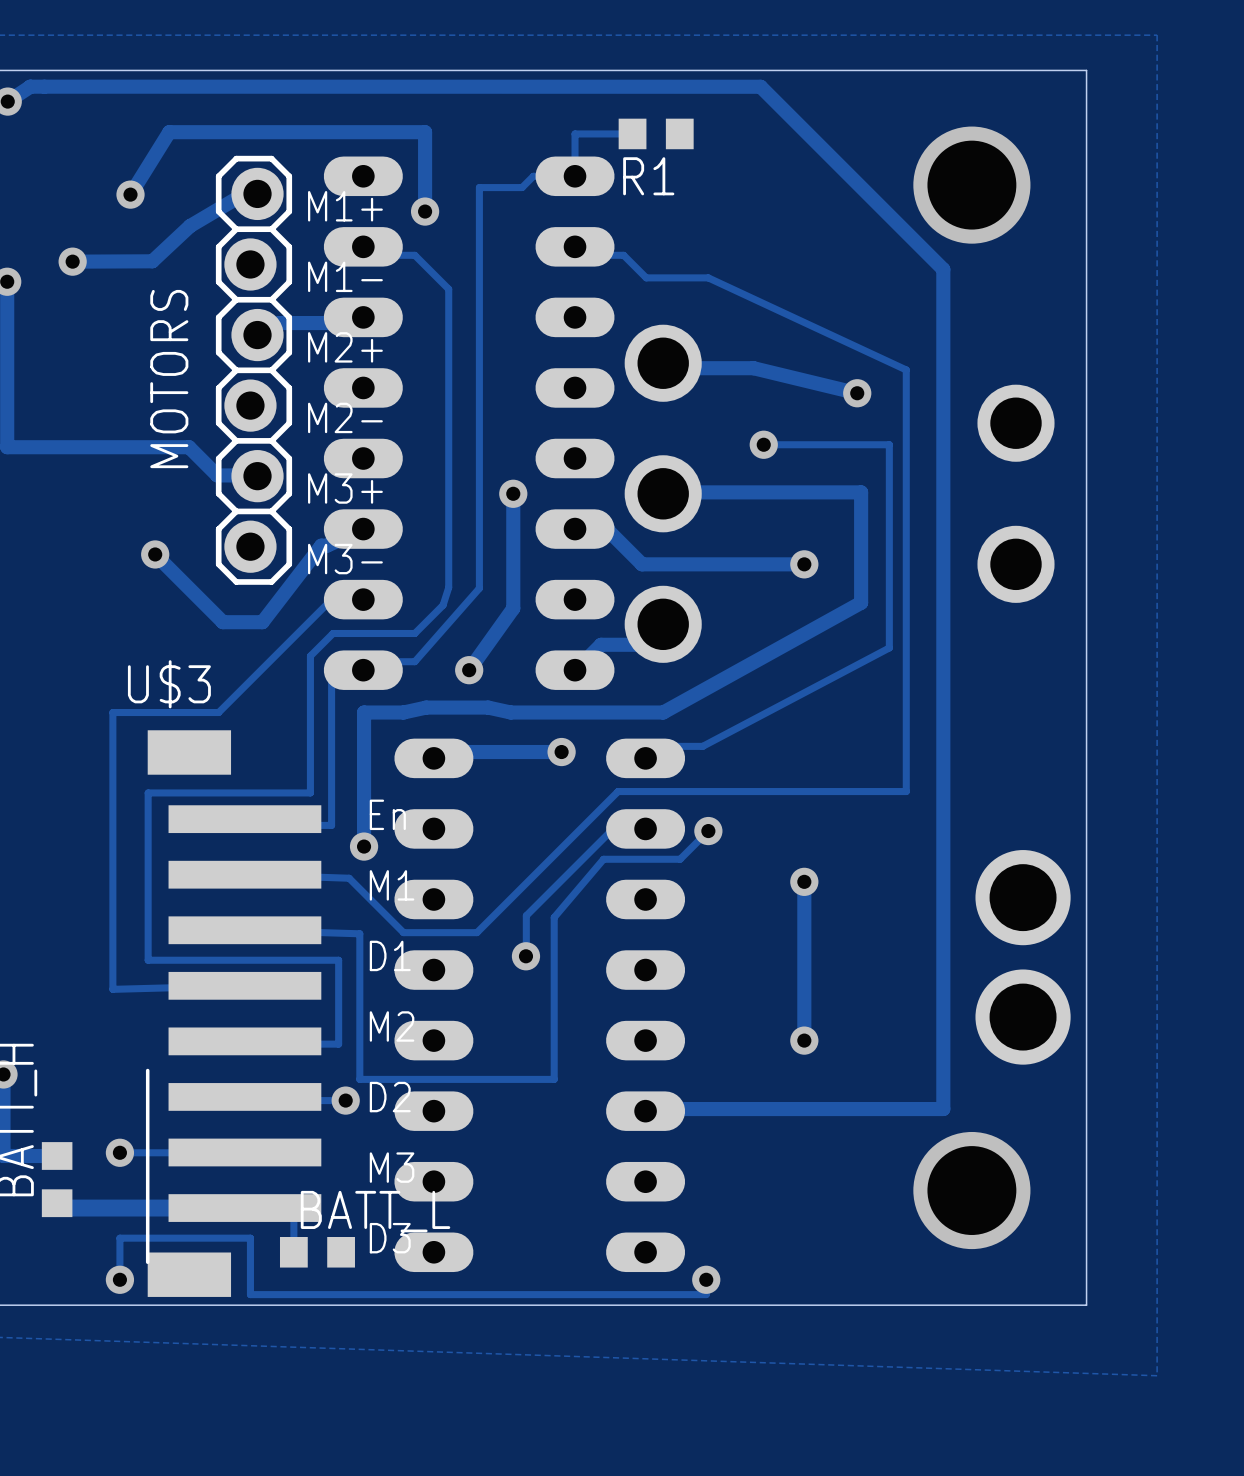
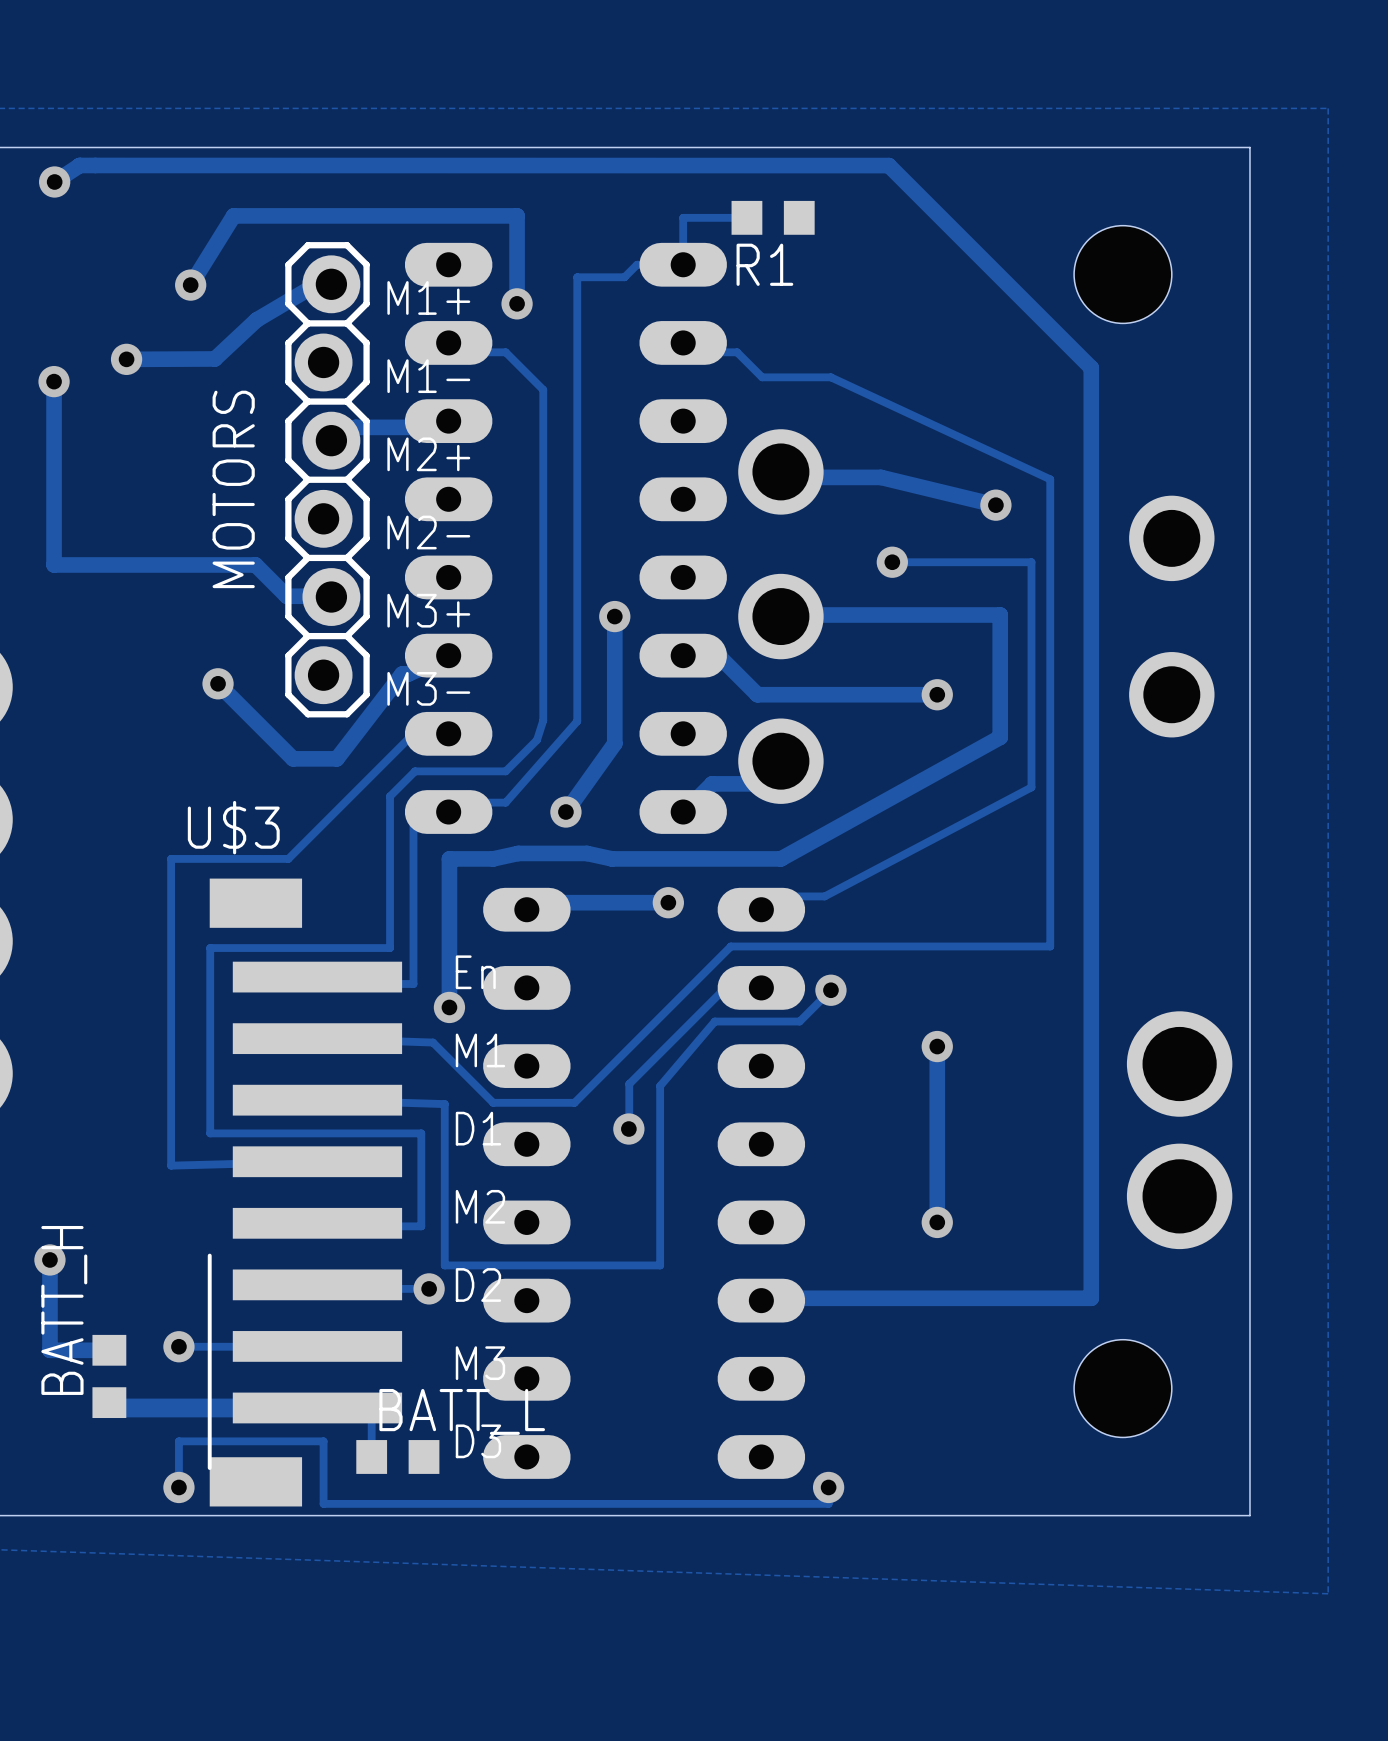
via: (971, 185) -> none
hole: none -> (1122, 274)
via: (971, 1190) -> none
hole: none -> (1122, 1388)

